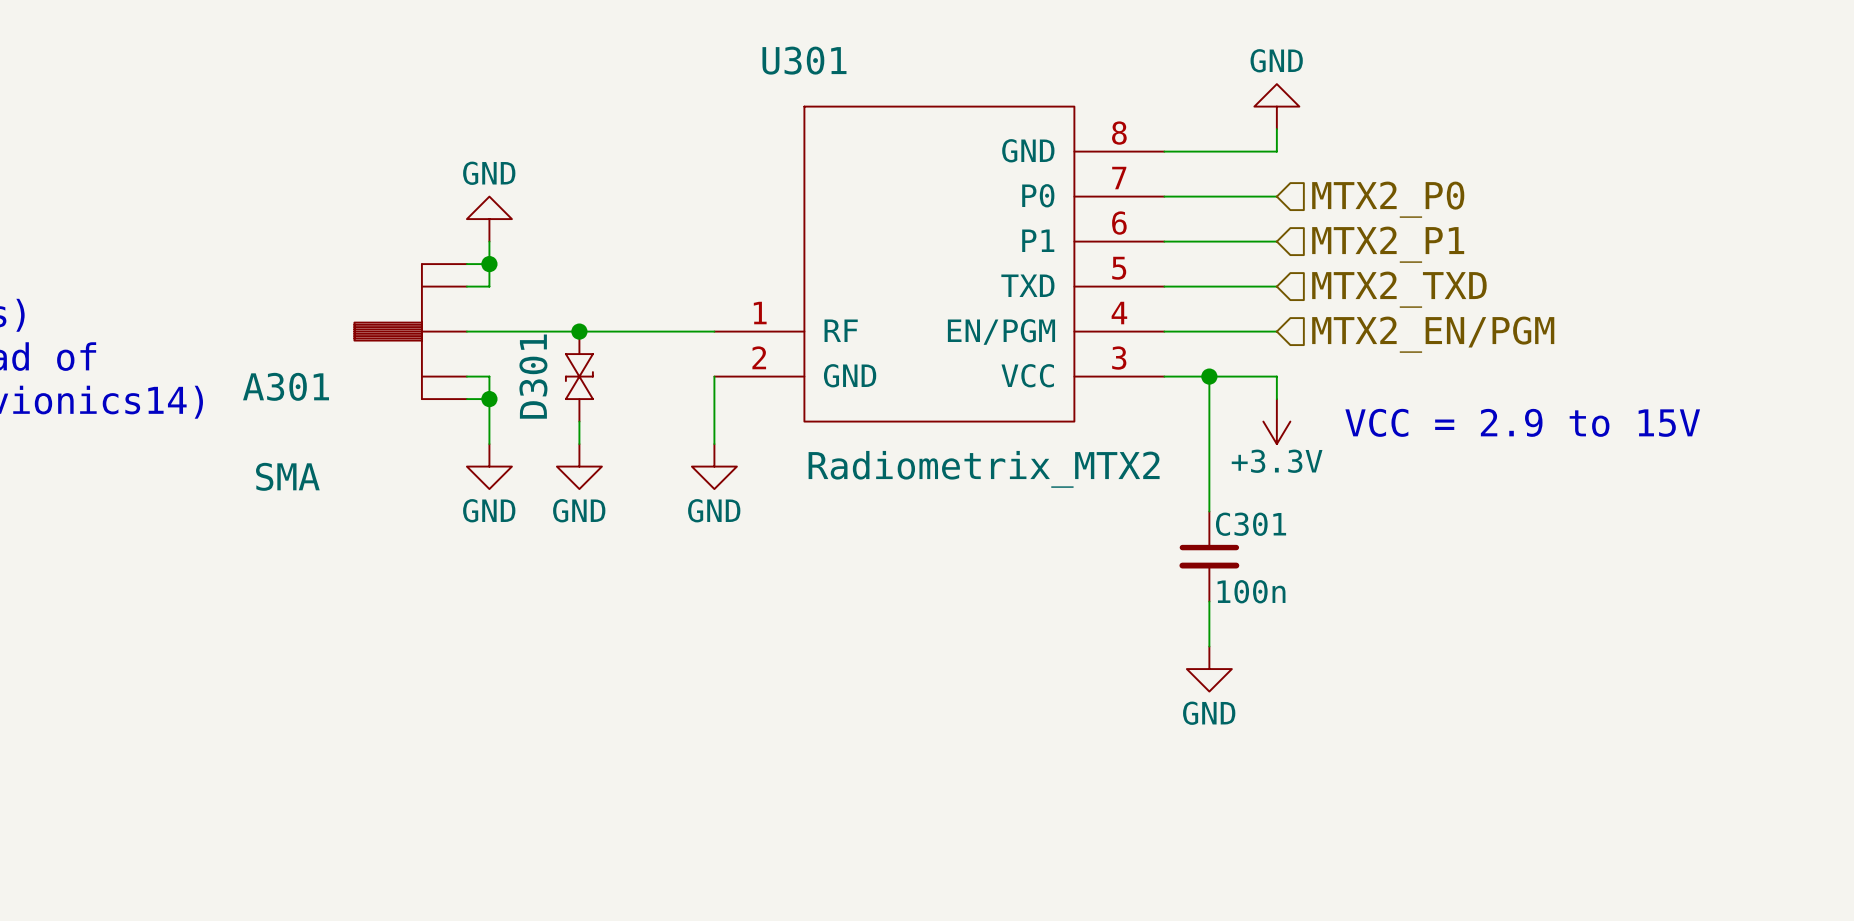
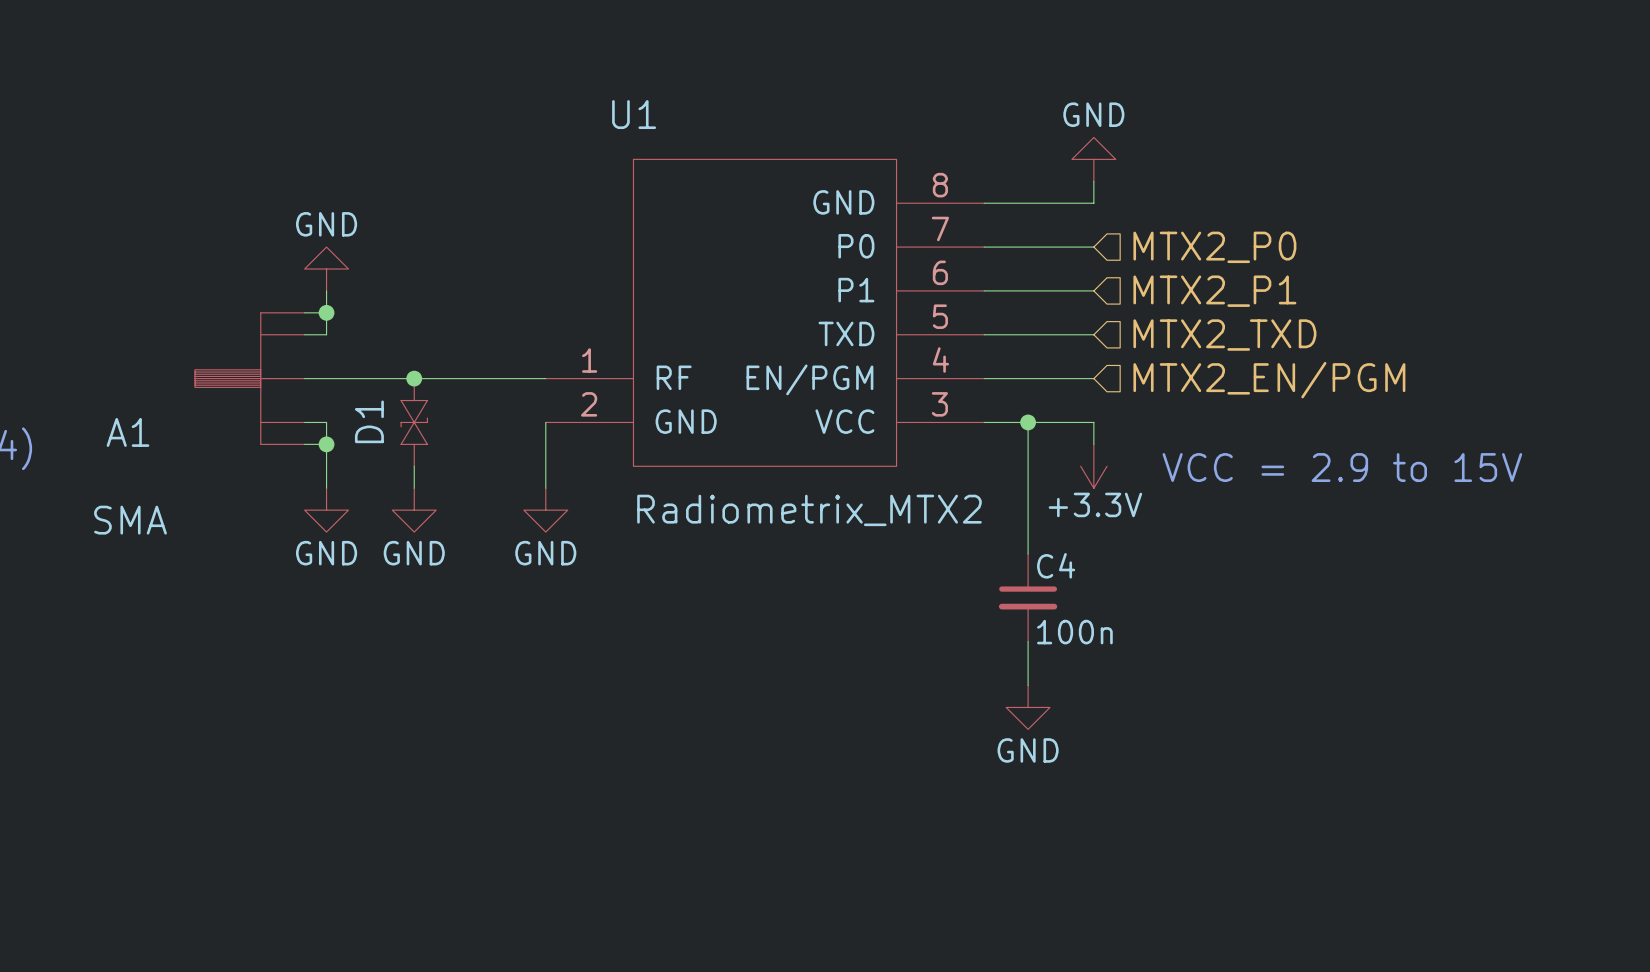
U301 name: U301 (804, 60) -> U1 (634, 114)
D301 name: D301 (533, 376) -> D1 (369, 421)
A301 name: A301 (286, 386) -> A1 (128, 432)
C301 name: C301 (1251, 524) -> C4 (1056, 565)

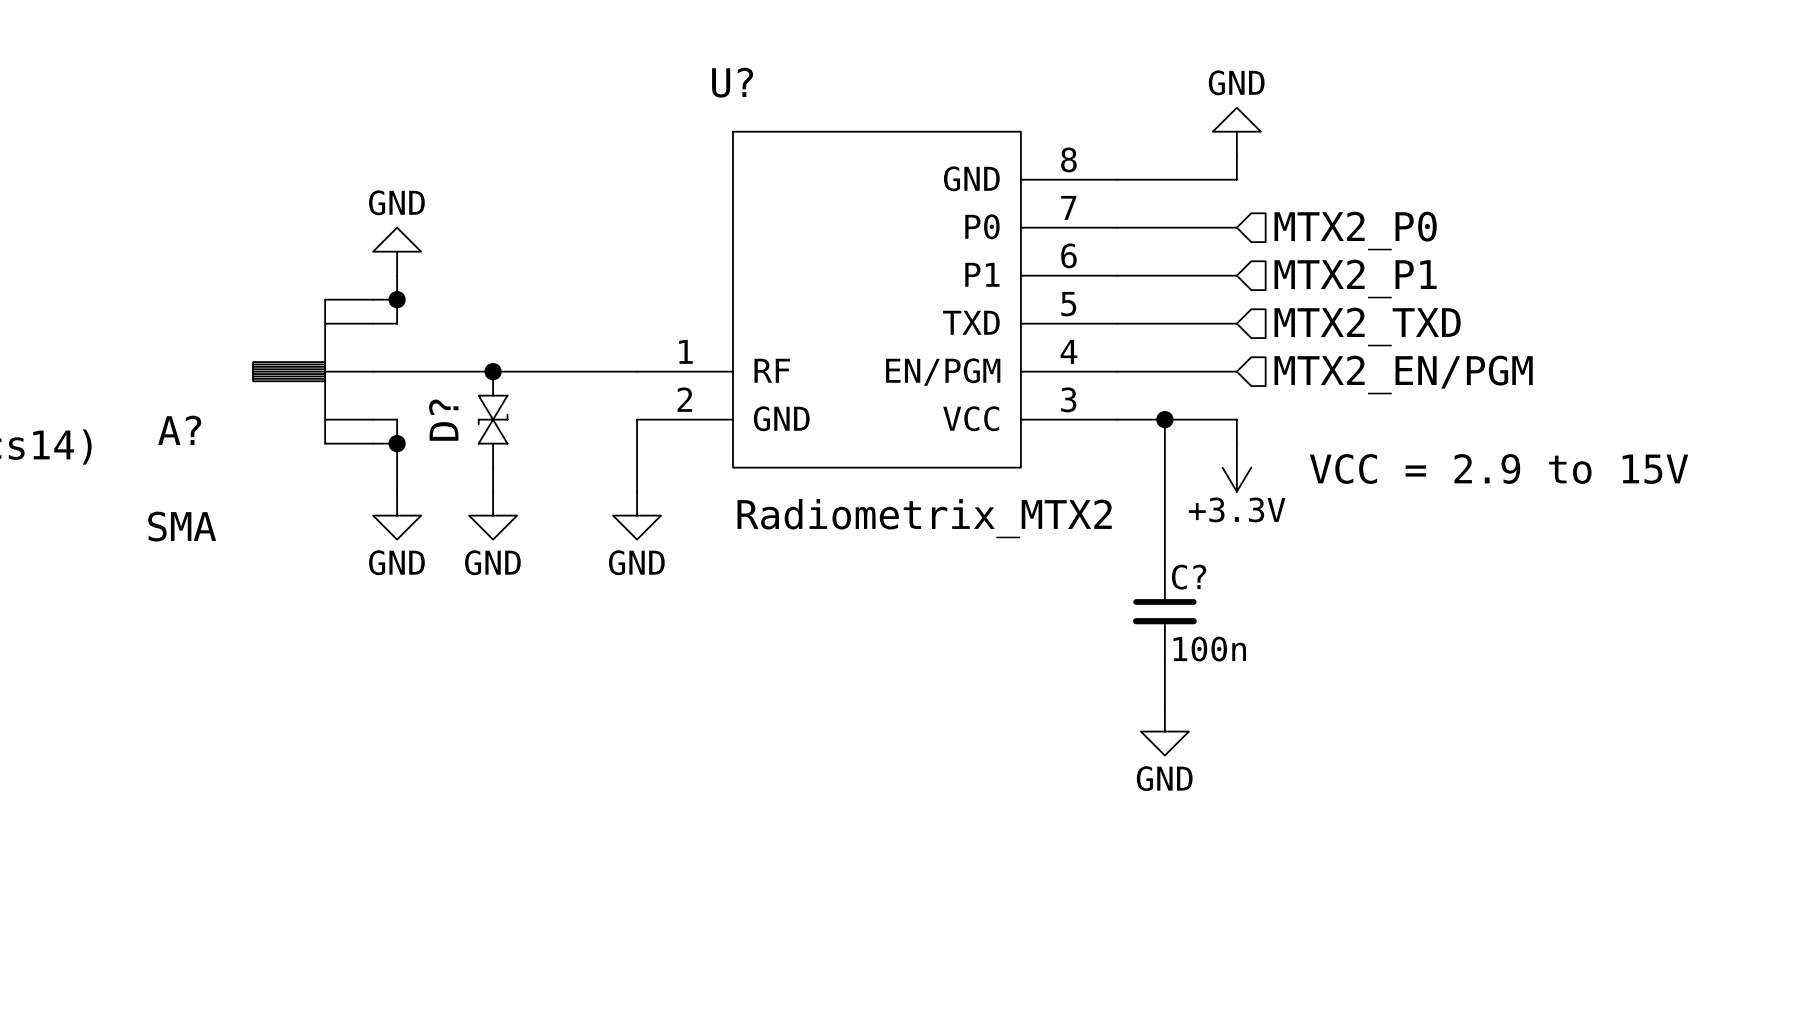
U1 name: U1 (634, 114) -> U? (732, 82)
D1 name: D1 (369, 421) -> D? (443, 420)
A1 name: A1 (128, 432) -> A? (179, 430)
C4 name: C4 (1056, 565) -> C? (1189, 577)

